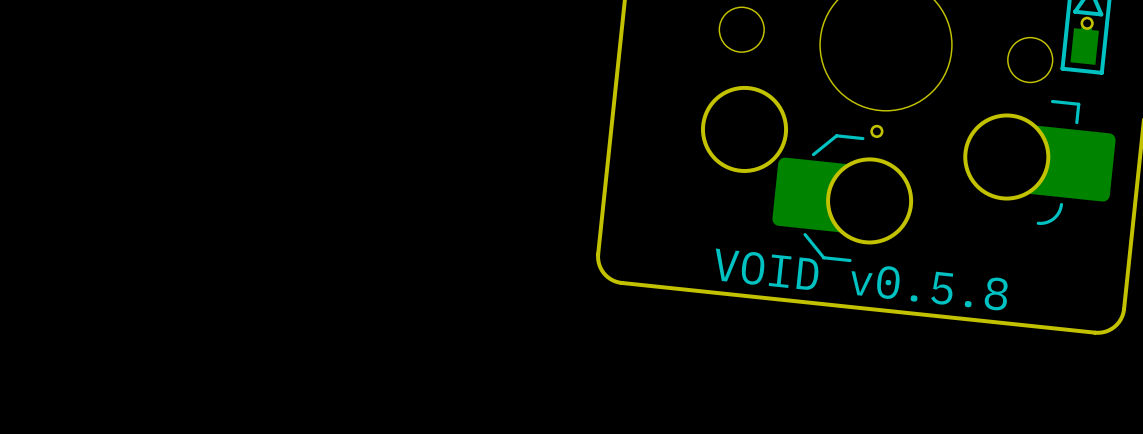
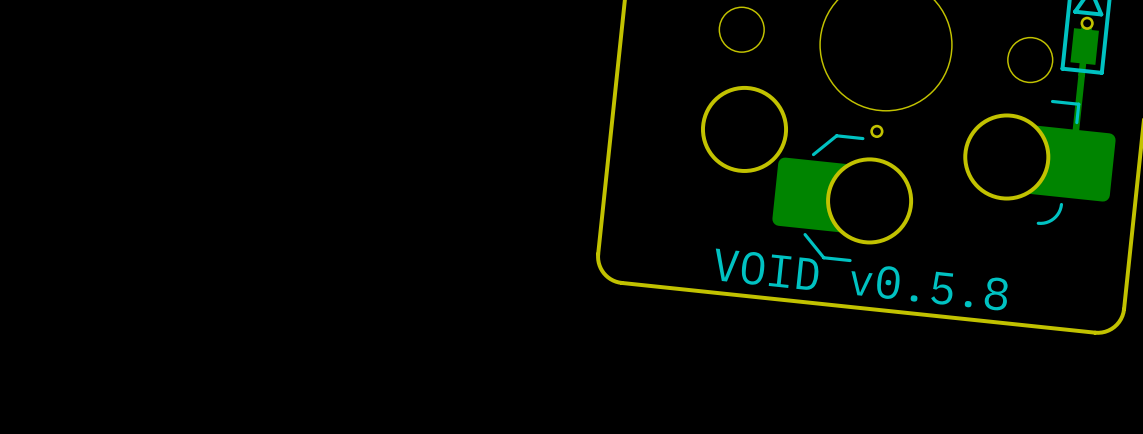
track: none -> (1084, 46) (1074, 142)

